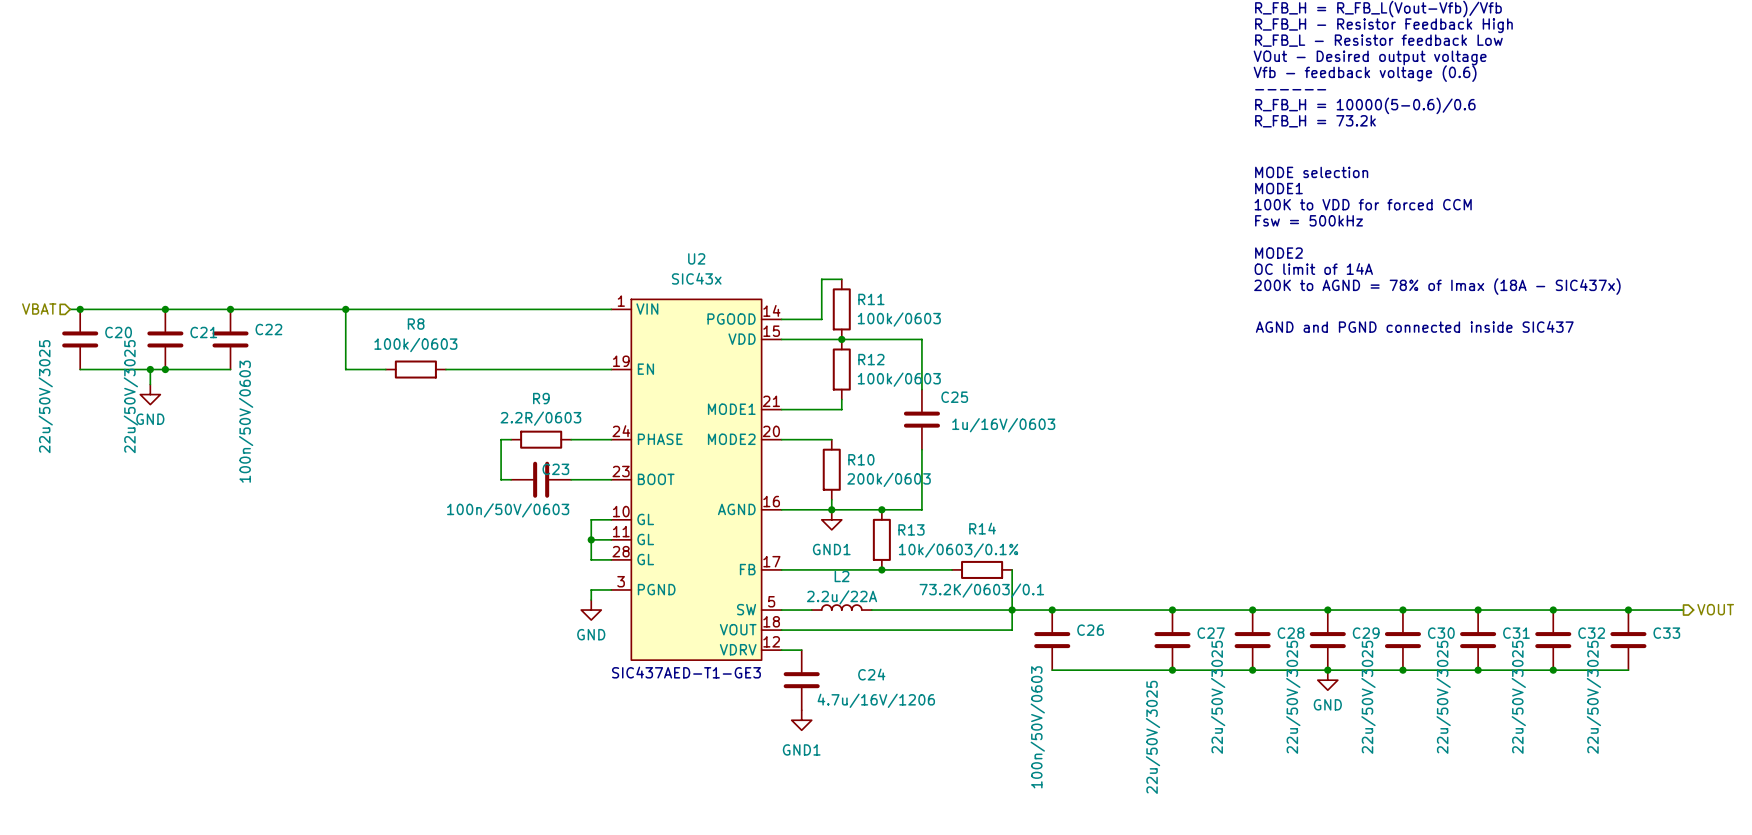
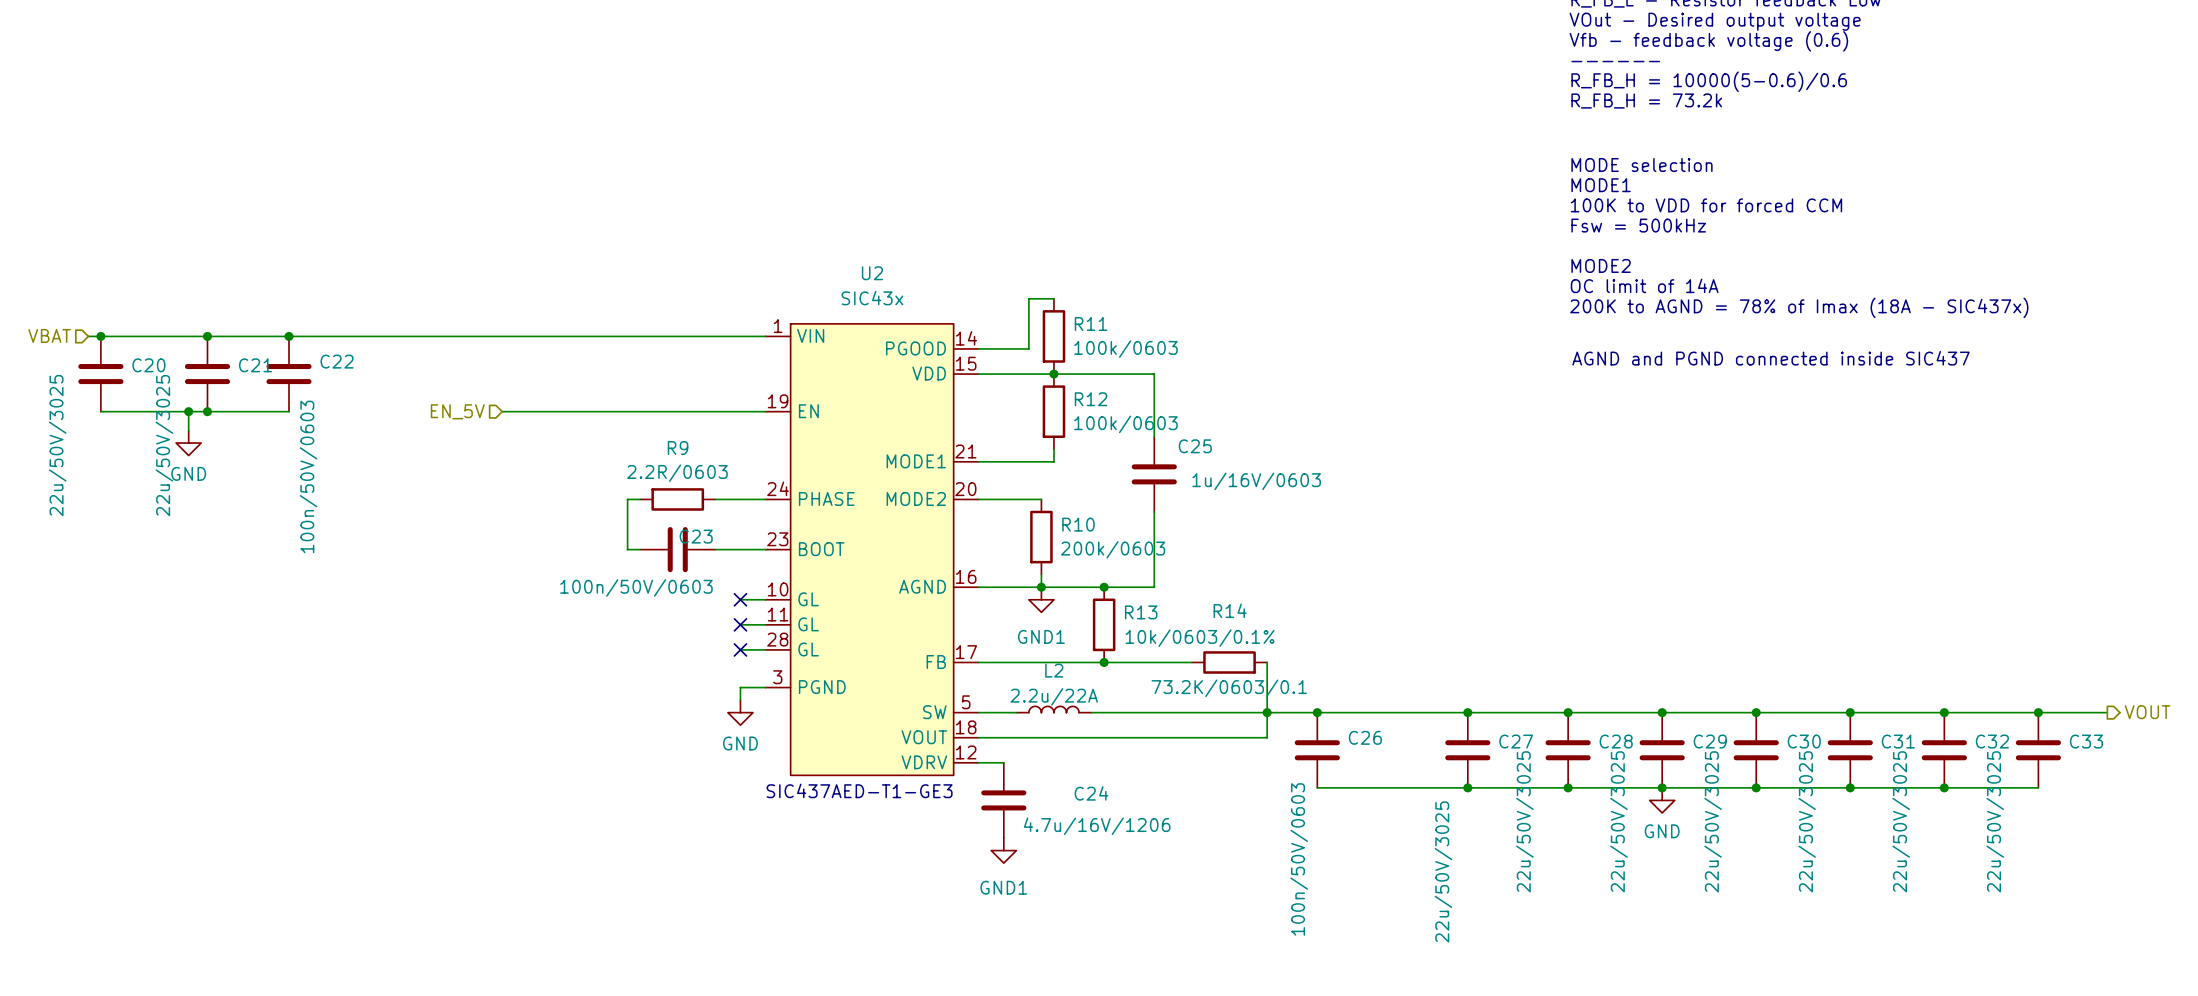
wire: (345, 309) (345, 369) (385, 369) -> none
junction: (345, 309) -> none
hierarchical label: none -> EN_5V (457, 411)
wire: none -> (502, 411) (558, 411)
R8: 100k/0603 (415, 369) -> none
wire: (591, 519) (591, 559) -> none
no-connect mark: none -> (740, 599)
junction: (591, 539) -> none
no-connect mark: none -> (740, 624)
no-connect mark: none -> (740, 649)

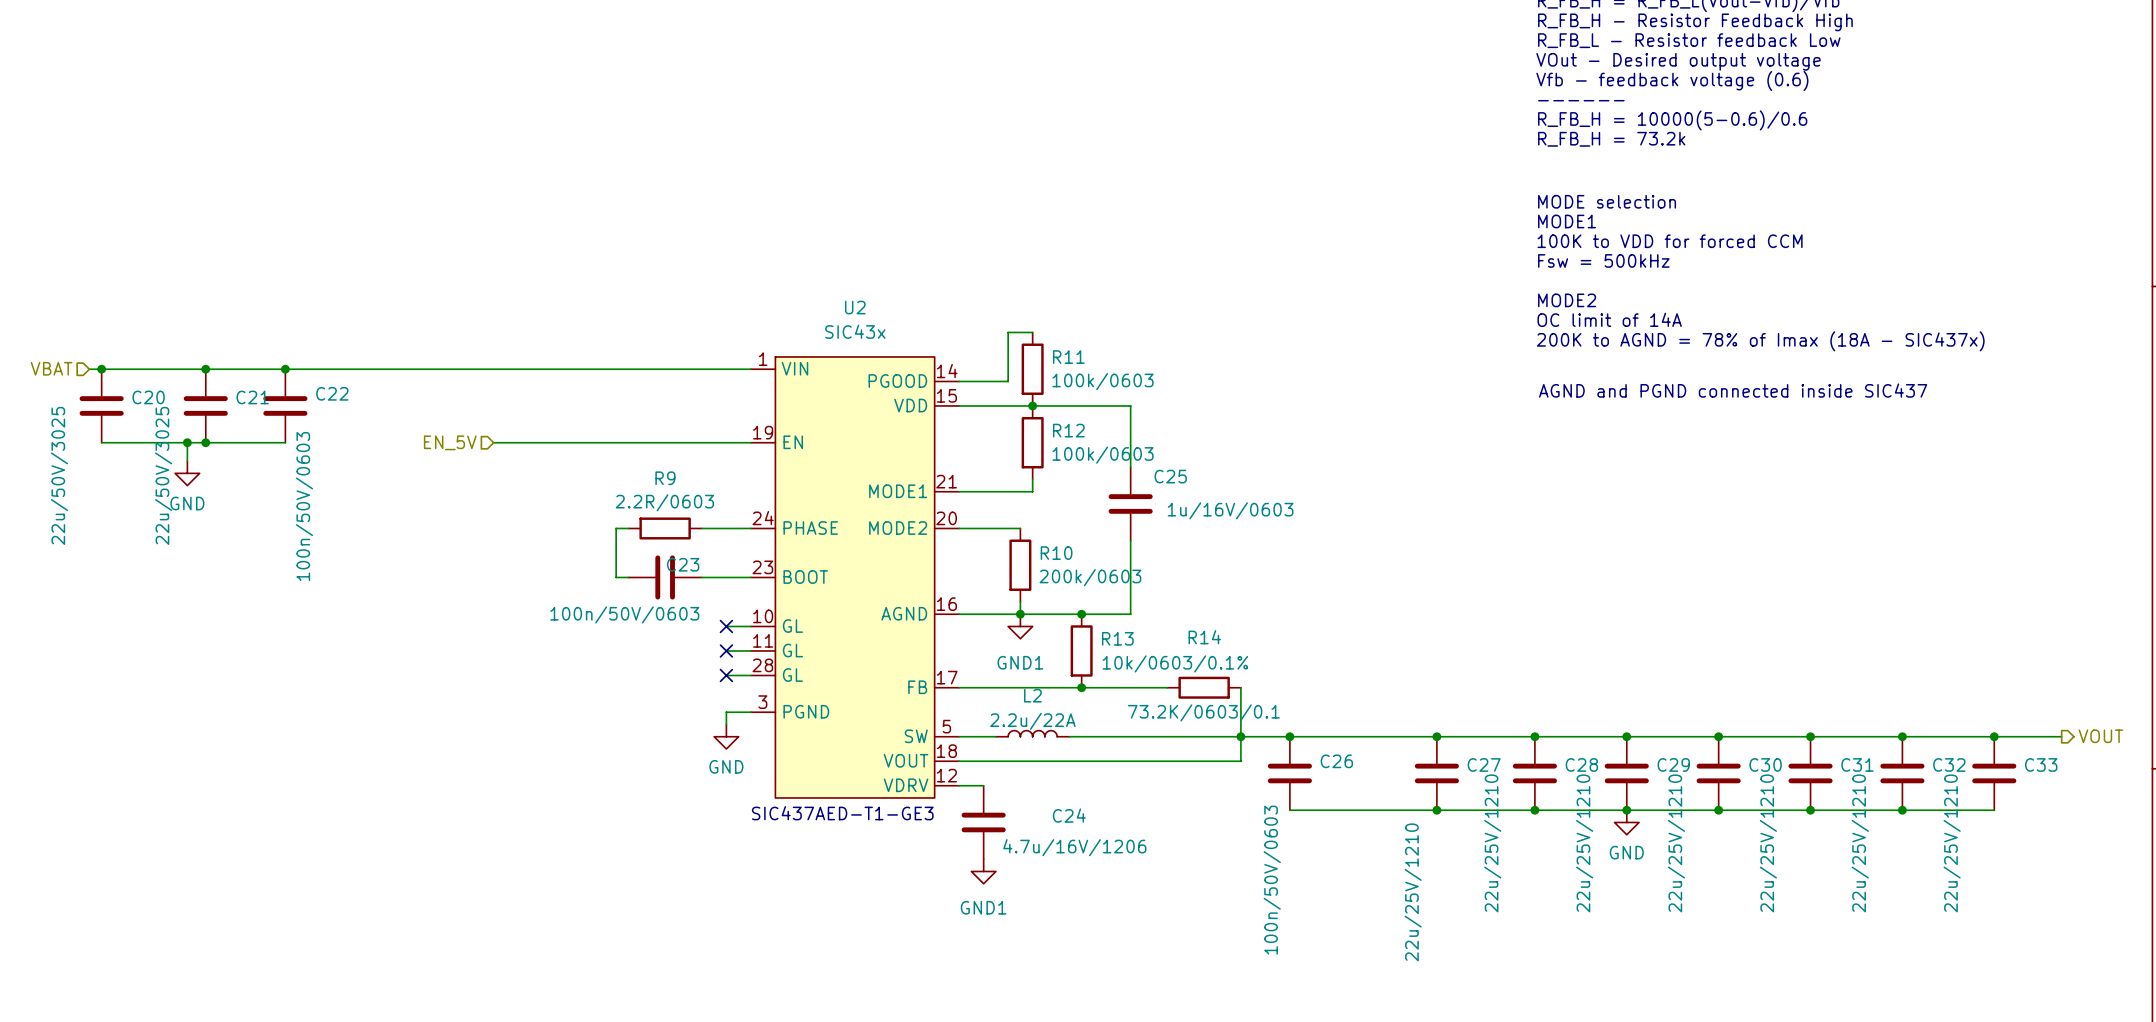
C28 value: 22u/50V/3025 (1524, 821) -> 22u/25V/1210 (1492, 843)
C29 value: 22u/50V/3025 (1619, 821) -> 22u/25V/1210 (1584, 843)
C30 value: 22u/50V/3025 (1713, 821) -> 22u/25V/1210 (1676, 843)
C31 value: 22u/50V/3025 (1807, 821) -> 22u/25V/1210 (1768, 843)
C32 value: 22u/50V/3025 (1901, 821) -> 22u/25V/1210 (1860, 843)
C33 value: 22u/50V/3025 (1995, 821) -> 22u/25V/1210 (1952, 843)
C27 value: 22u/50V/3025 (1443, 871) -> 22u/25V/1210 (1413, 892)

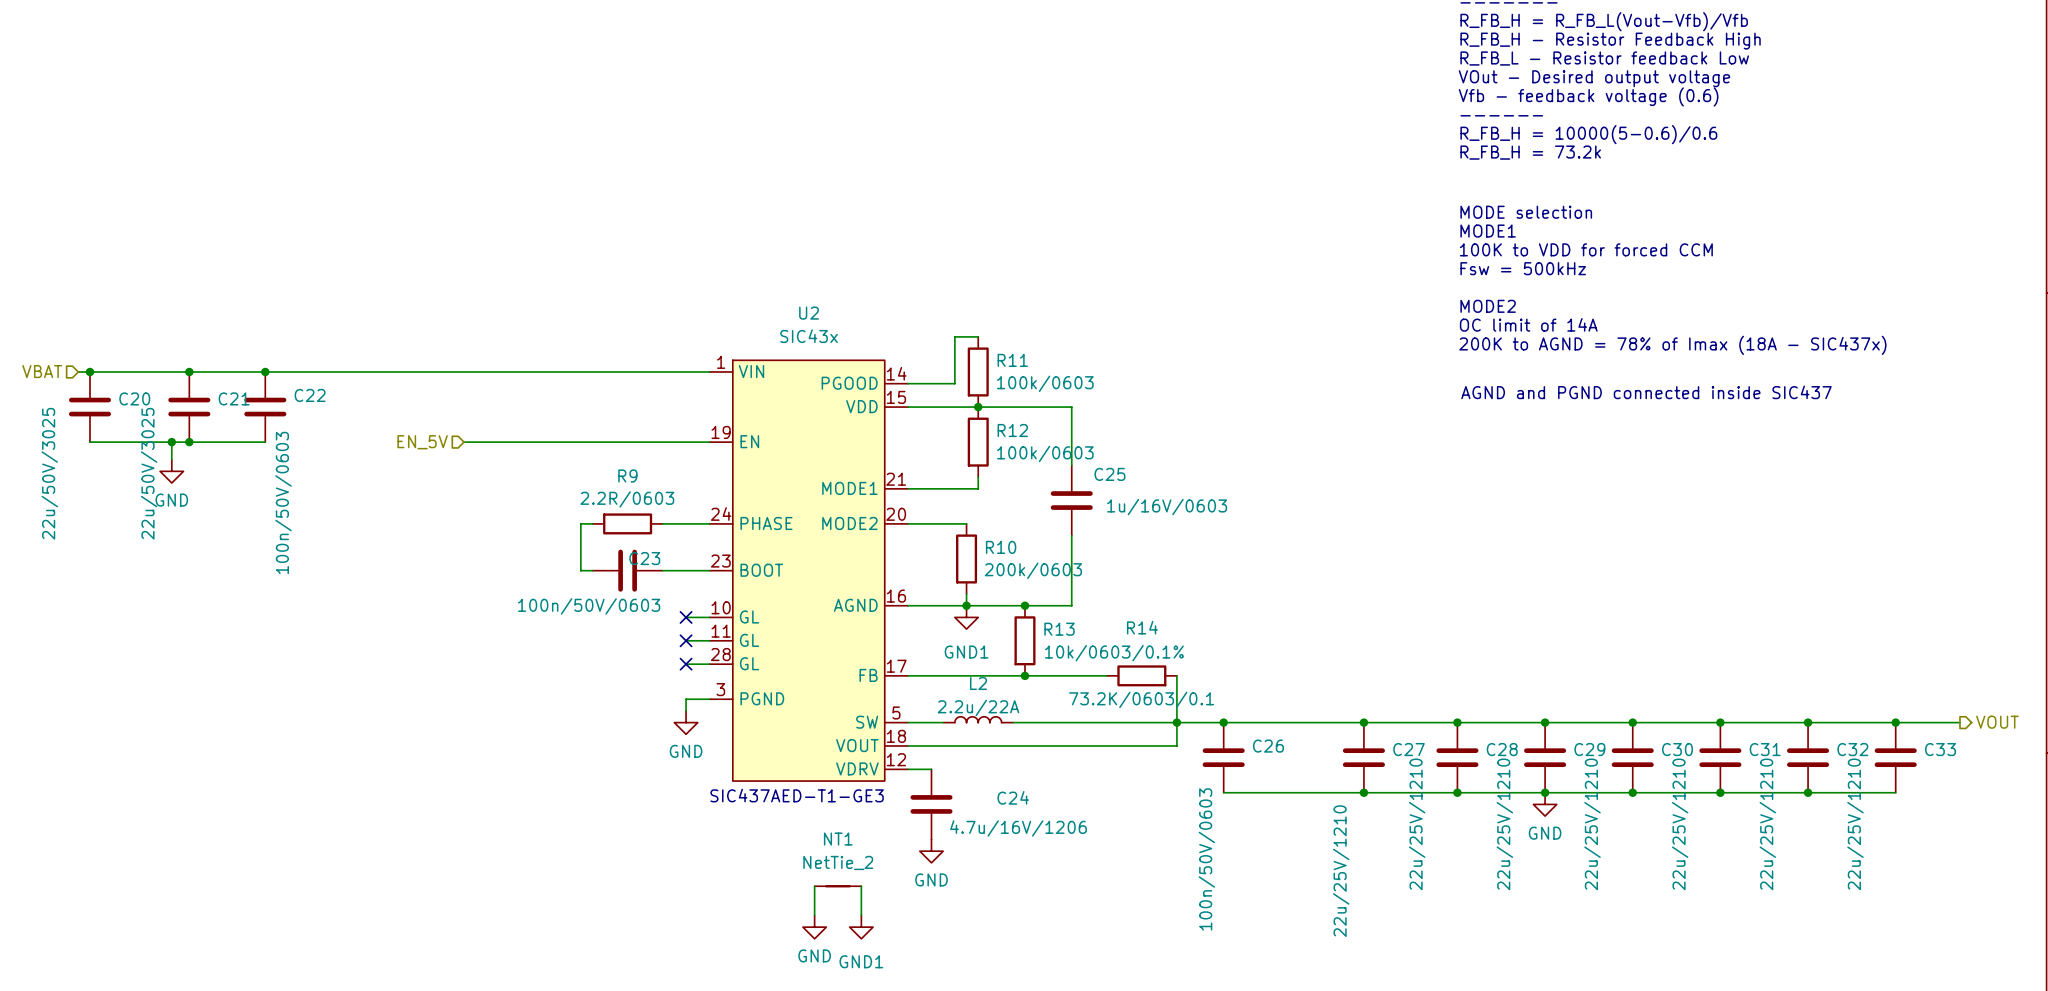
power symbol: GND1 (983, 871) -> GND (931, 851)
wire: none -> (814, 886) (814, 915)
NT1: none -> NetTie_2 (837, 886)
wire: none -> (861, 886) (861, 915)
power symbol: none -> GND (814, 927)
power symbol: none -> GND1 (861, 927)

